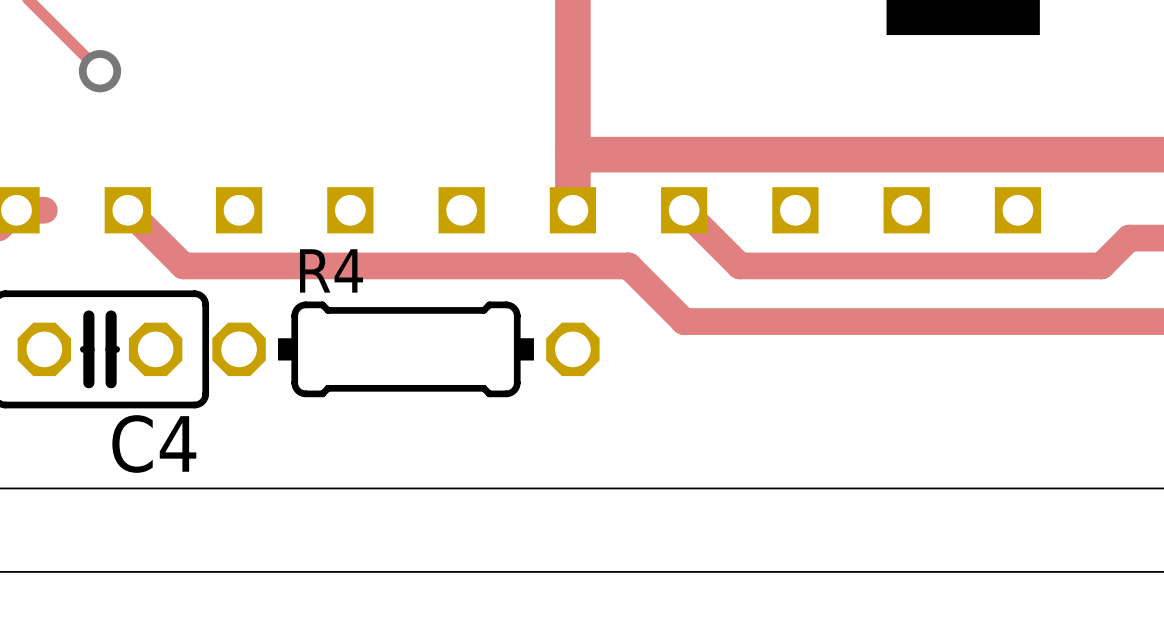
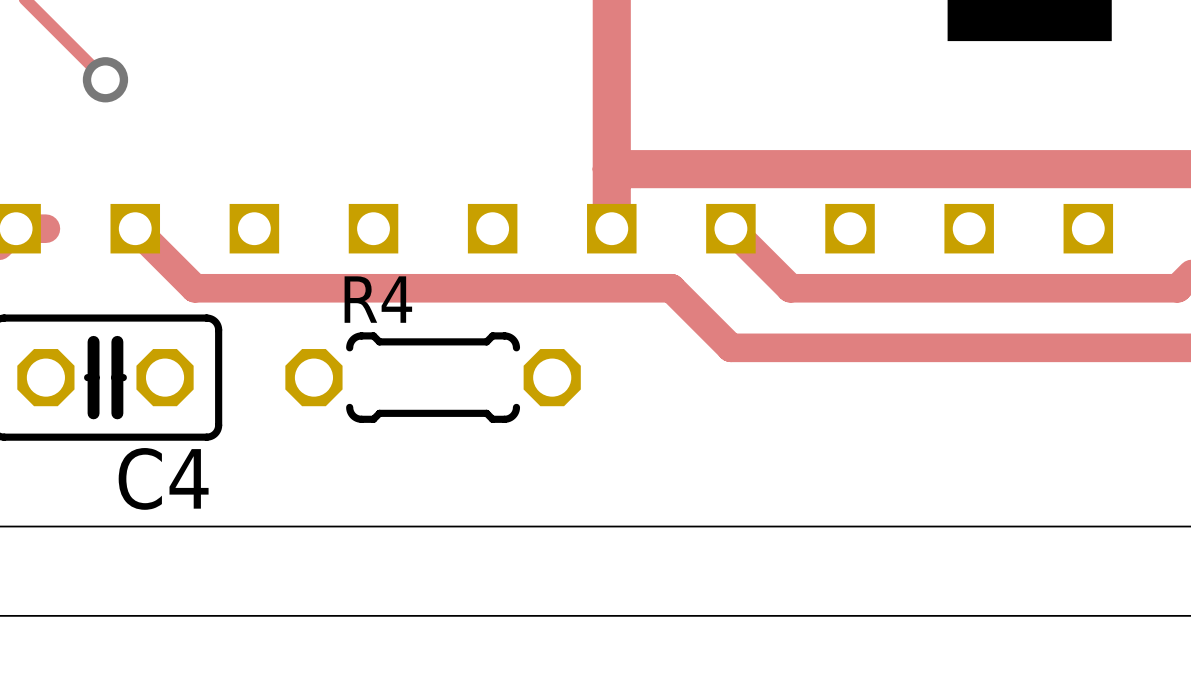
R4 footprint: [212, 301, 600, 398] -> [285, 332, 581, 423]

